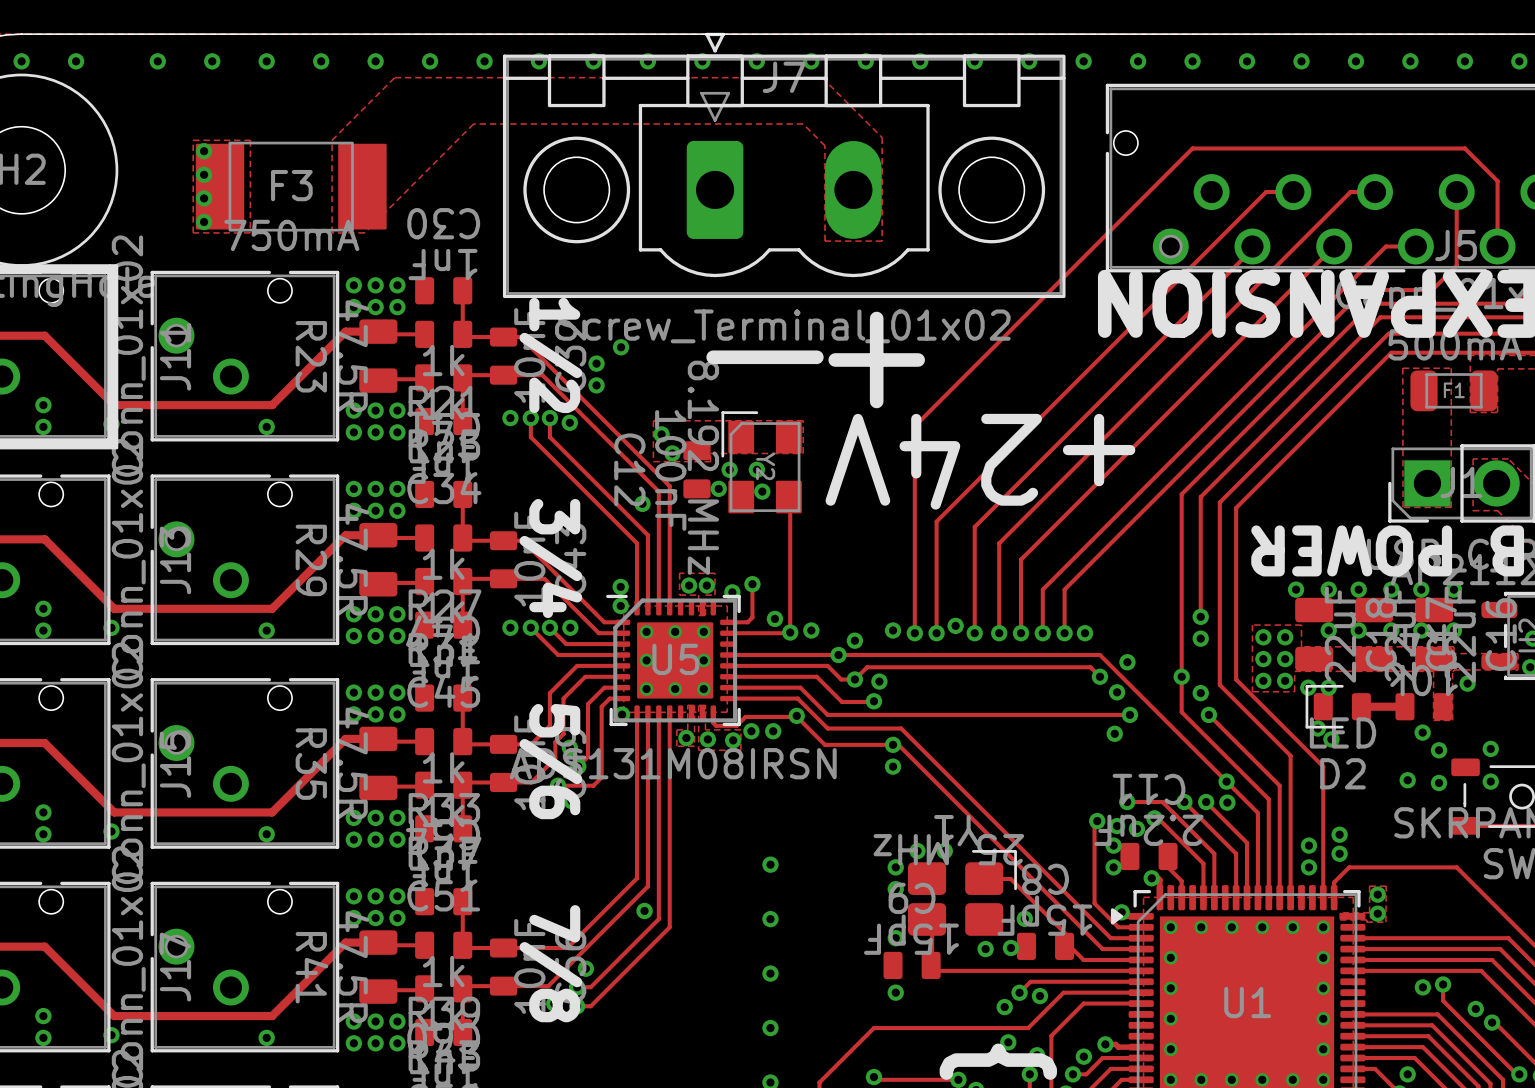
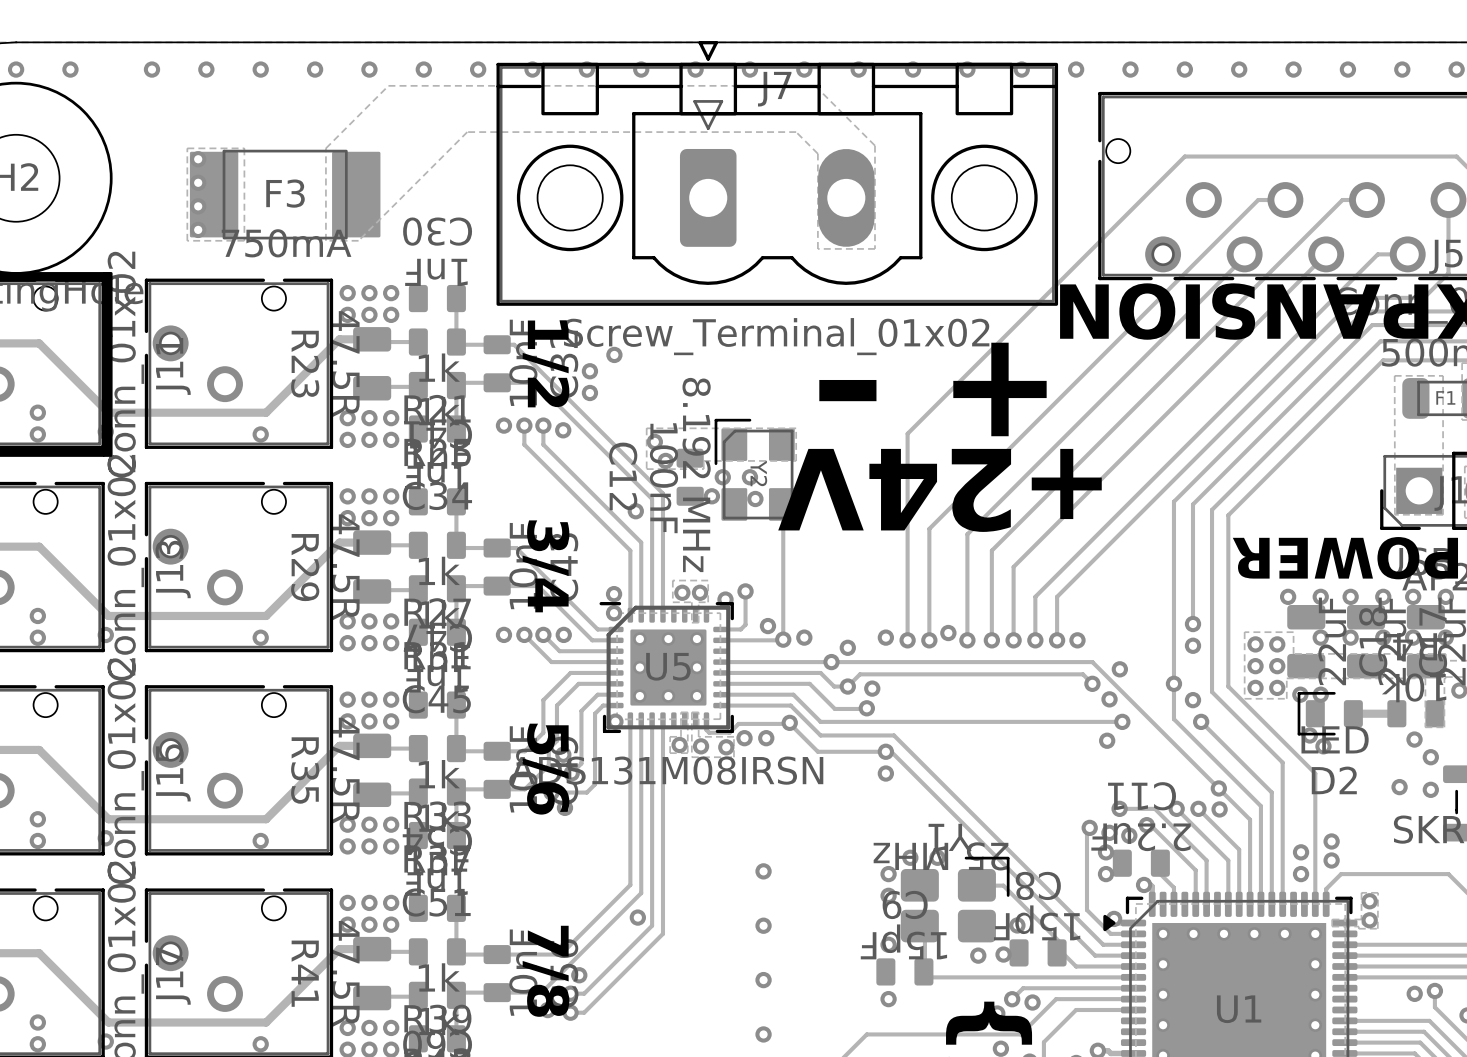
text position: - (765, 357) -> - (847, 390)
text position: + (876, 359) -> + (999, 389)
text position: +24V (980, 461) -> +24V (940, 490)

